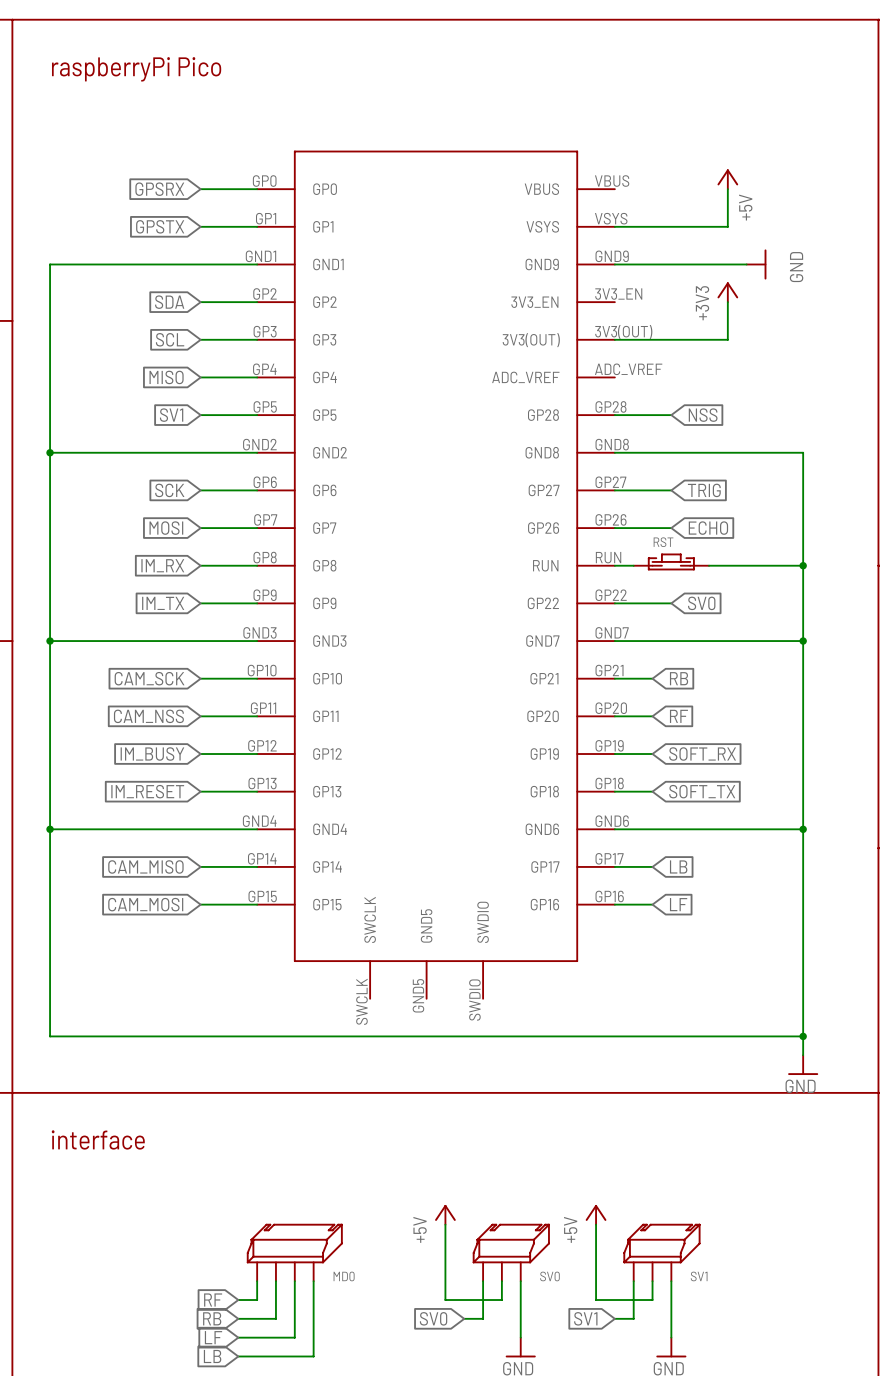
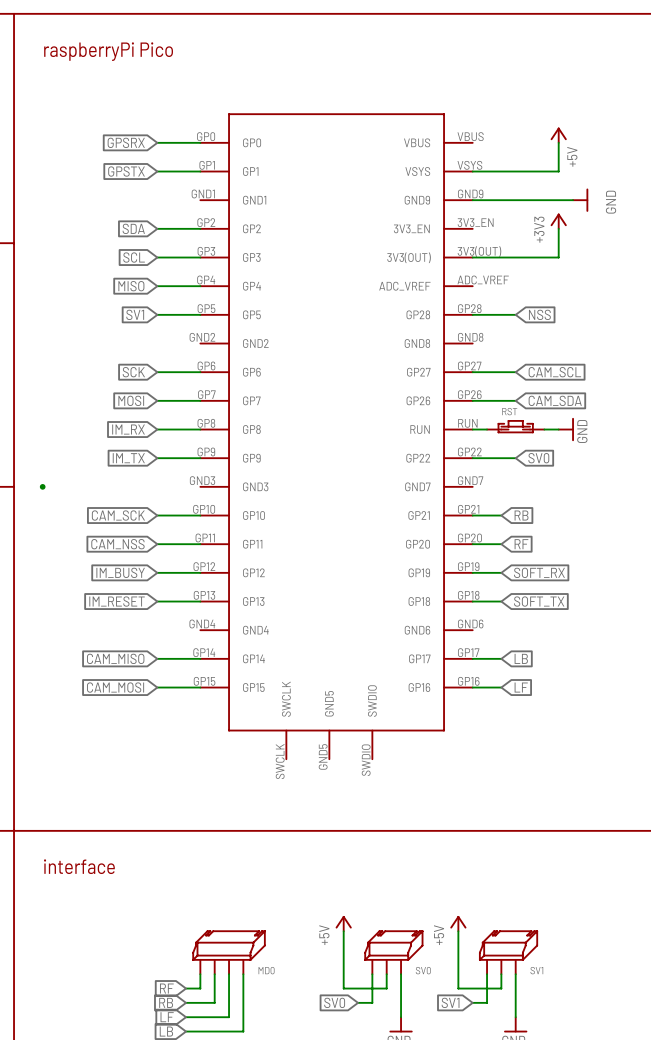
wire: (257, 264) (50, 264) (50, 1036) (803, 1036) -> none
wire: (50, 452) (257, 452) -> none
junction: (50, 452) -> none
wire: (614, 452) (803, 452) (803, 1055) -> none
global label: TRIG (704, 490) -> CAM_SCL (554, 372)
global label: ECHO (708, 528) -> CAM_SDA (555, 400)
wire: (727, 565) (803, 565) -> none
power symbol: none -> GND (566, 429)
junction: (803, 565) -> none
wire: (50, 641) (257, 641) -> none
wire: (614, 641) (803, 641) -> none
junction: (803, 641) -> none
wire: (50, 829) (257, 829) -> none
junction: (50, 829) -> none
wire: (614, 829) (803, 829) -> none
junction: (803, 829) -> none
junction: (803, 1036) -> none
power symbol: GND (803, 1065) -> none

